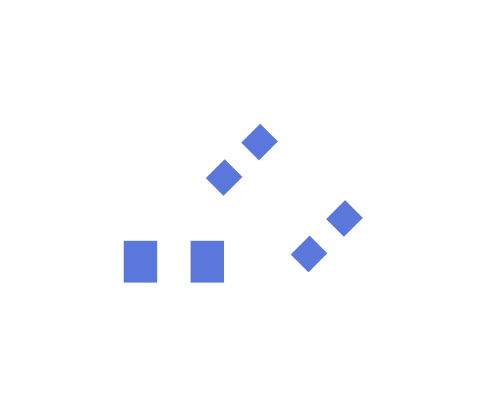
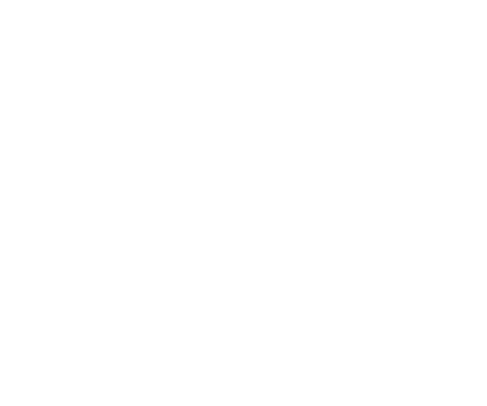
part: (241, 159) -> none
part: (326, 236) -> none
part: (173, 261) -> none

